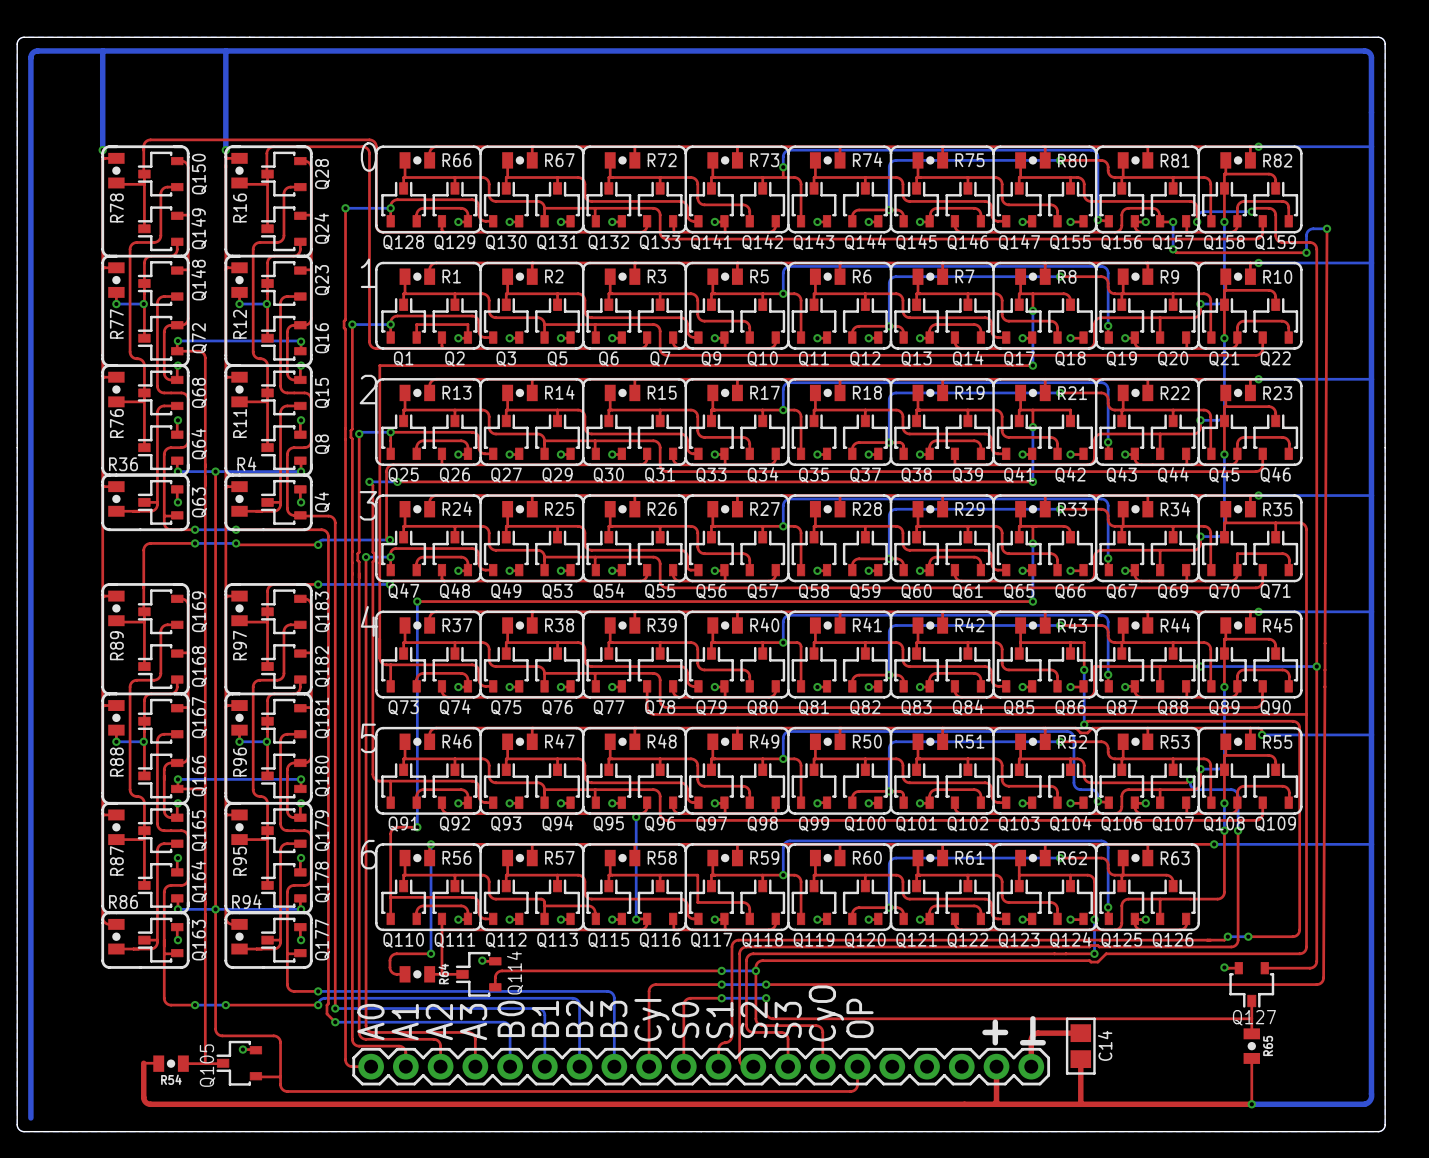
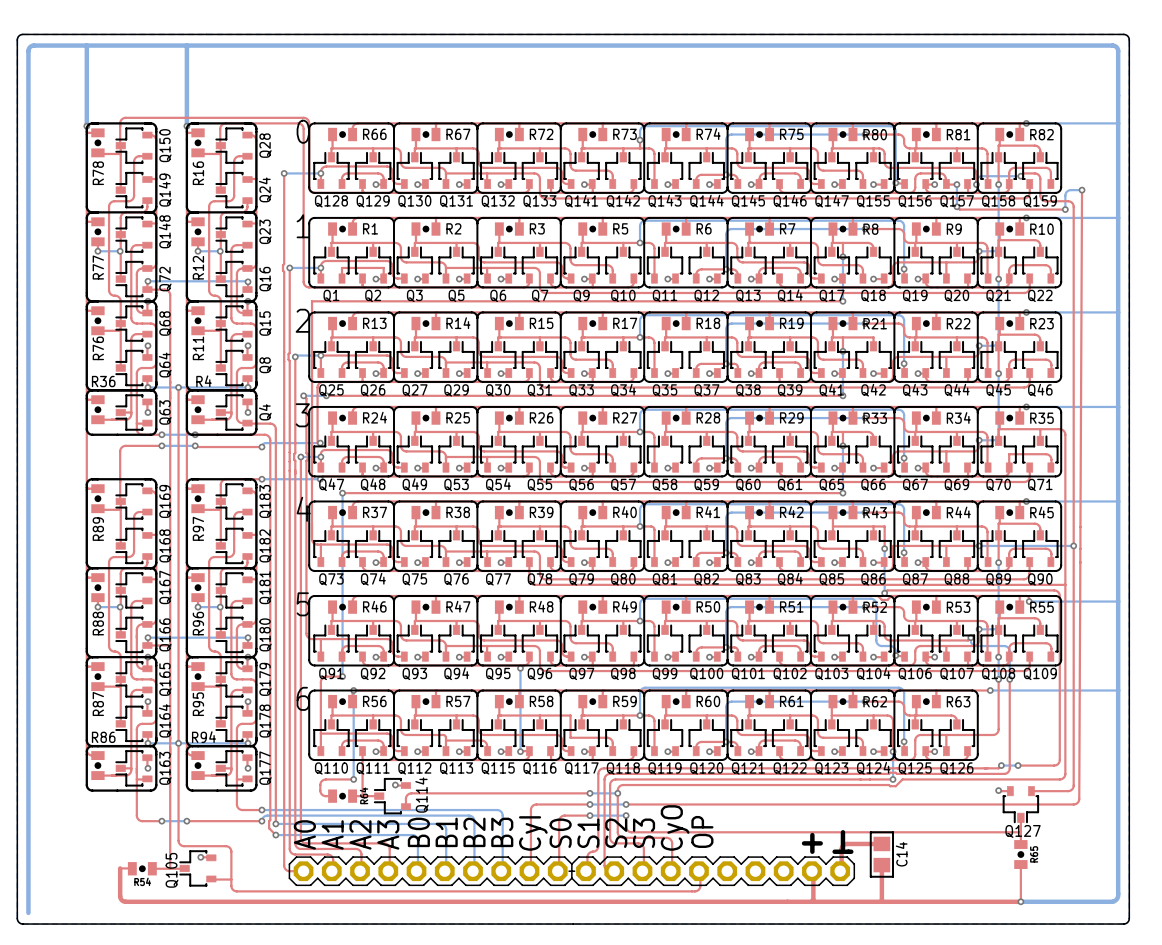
part footprint: [352, 1047, 1051, 1086] -> [288, 856, 856, 887]

